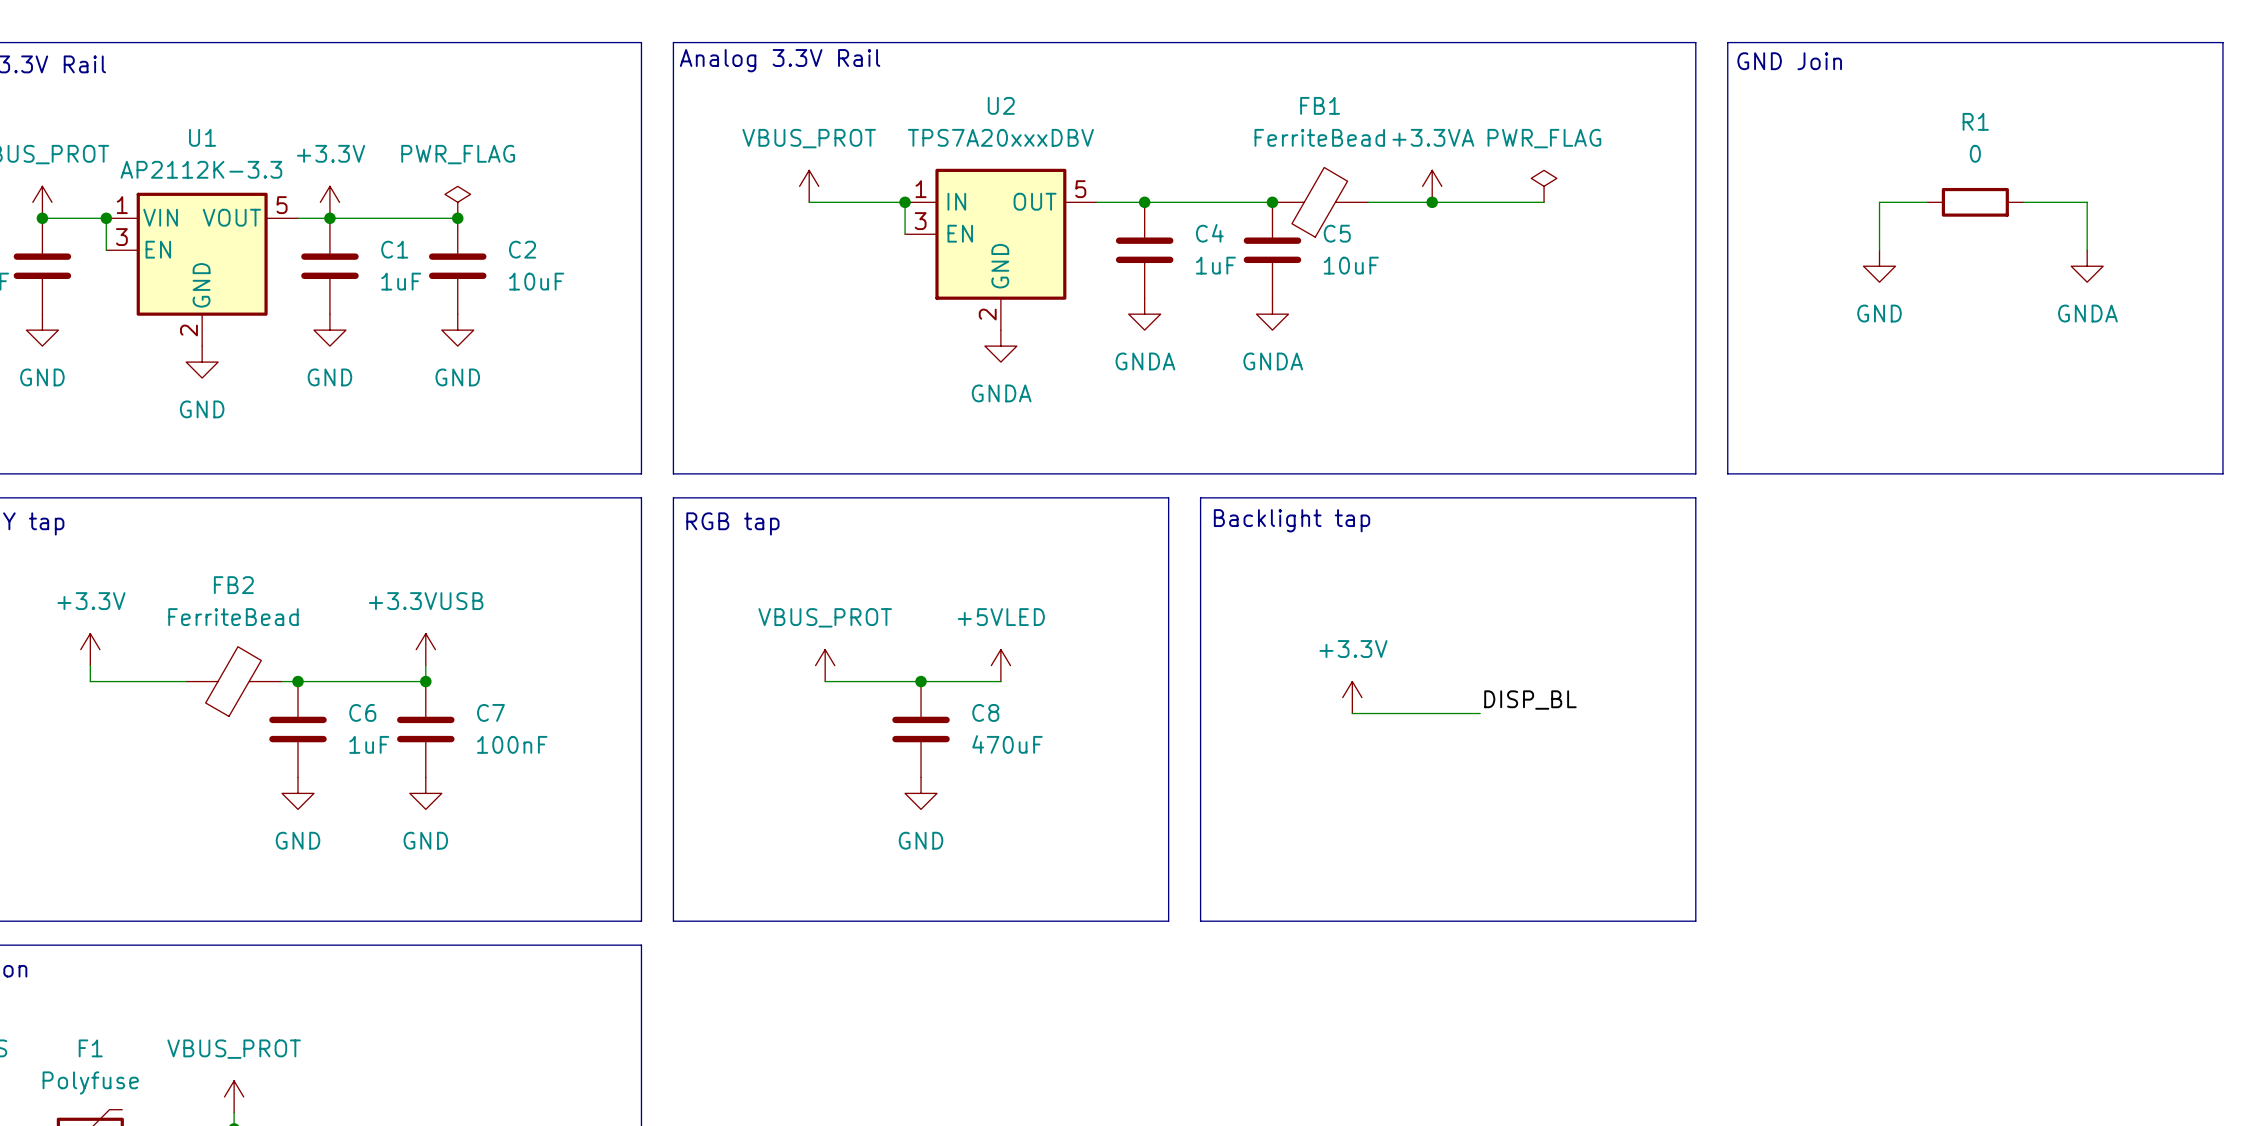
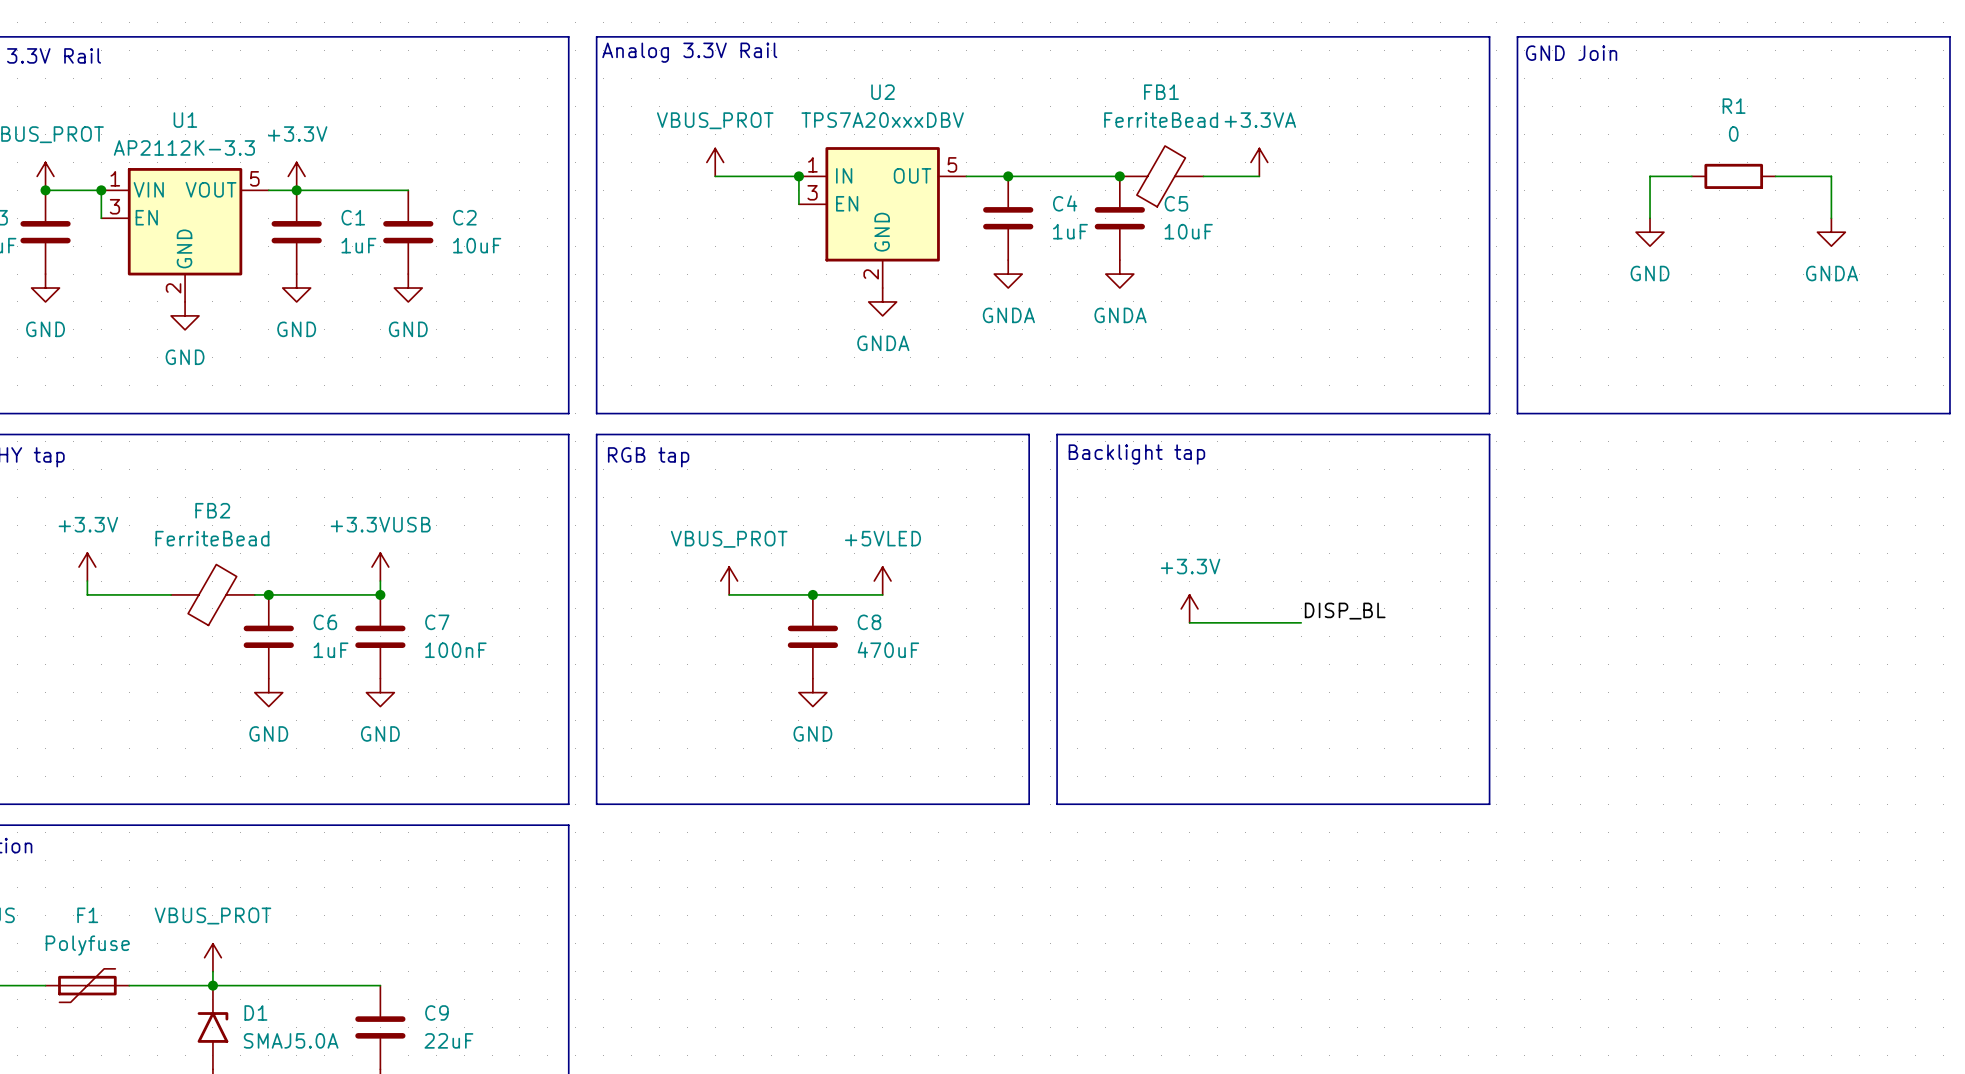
power symbol: PWR_FLAG (1544, 186) -> none
power symbol: PWR_FLAG (457, 202) -> none
wire: (1432, 202) (1544, 202) -> none
junction: (1432, 202) -> none
junction: (457, 218) -> none

